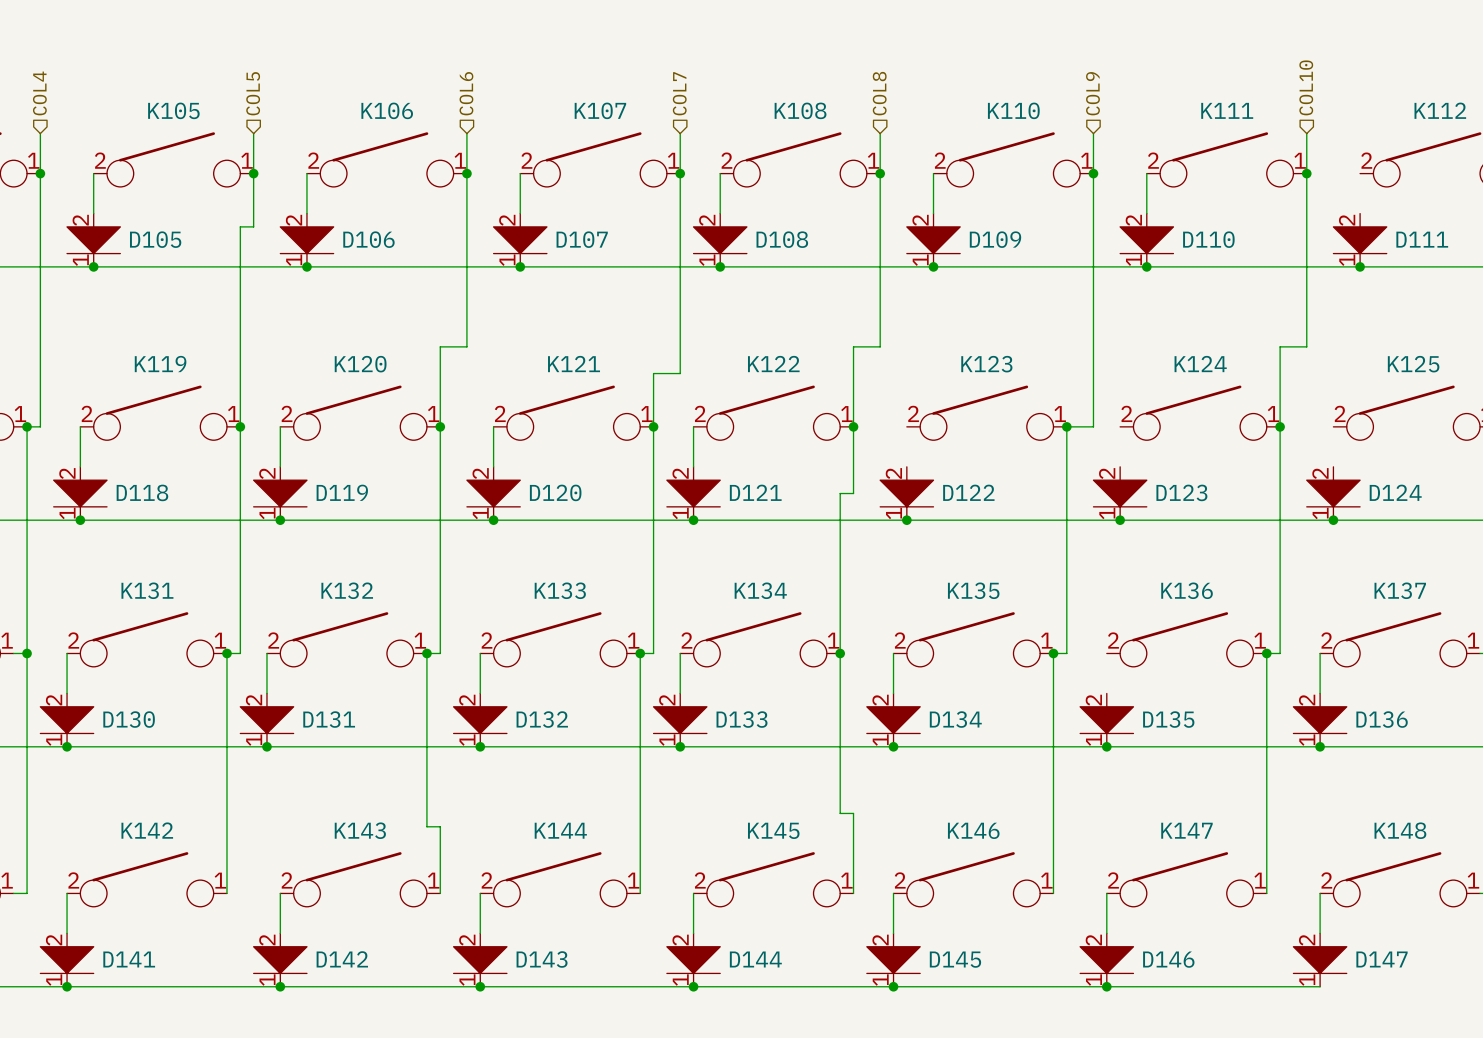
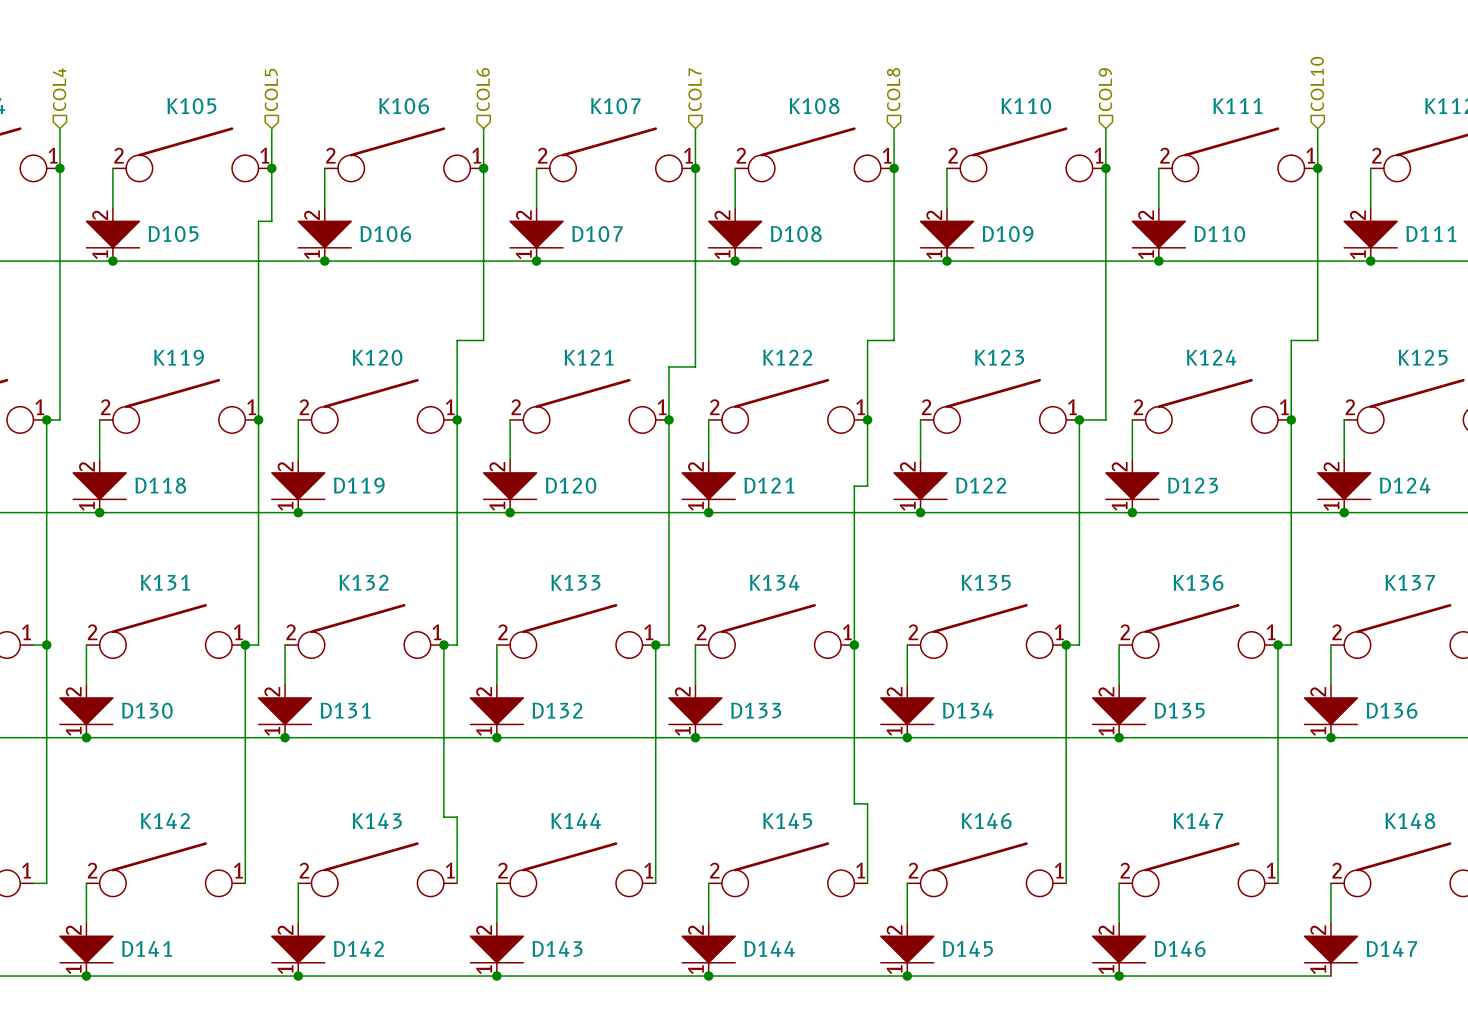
wire: none -> (1370, 168) (1370, 208)
wire: none -> (920, 419) (920, 459)
wire: none -> (1132, 419) (1132, 459)
wire: none -> (1344, 419) (1344, 459)
wire: none -> (1119, 645) (1119, 684)

